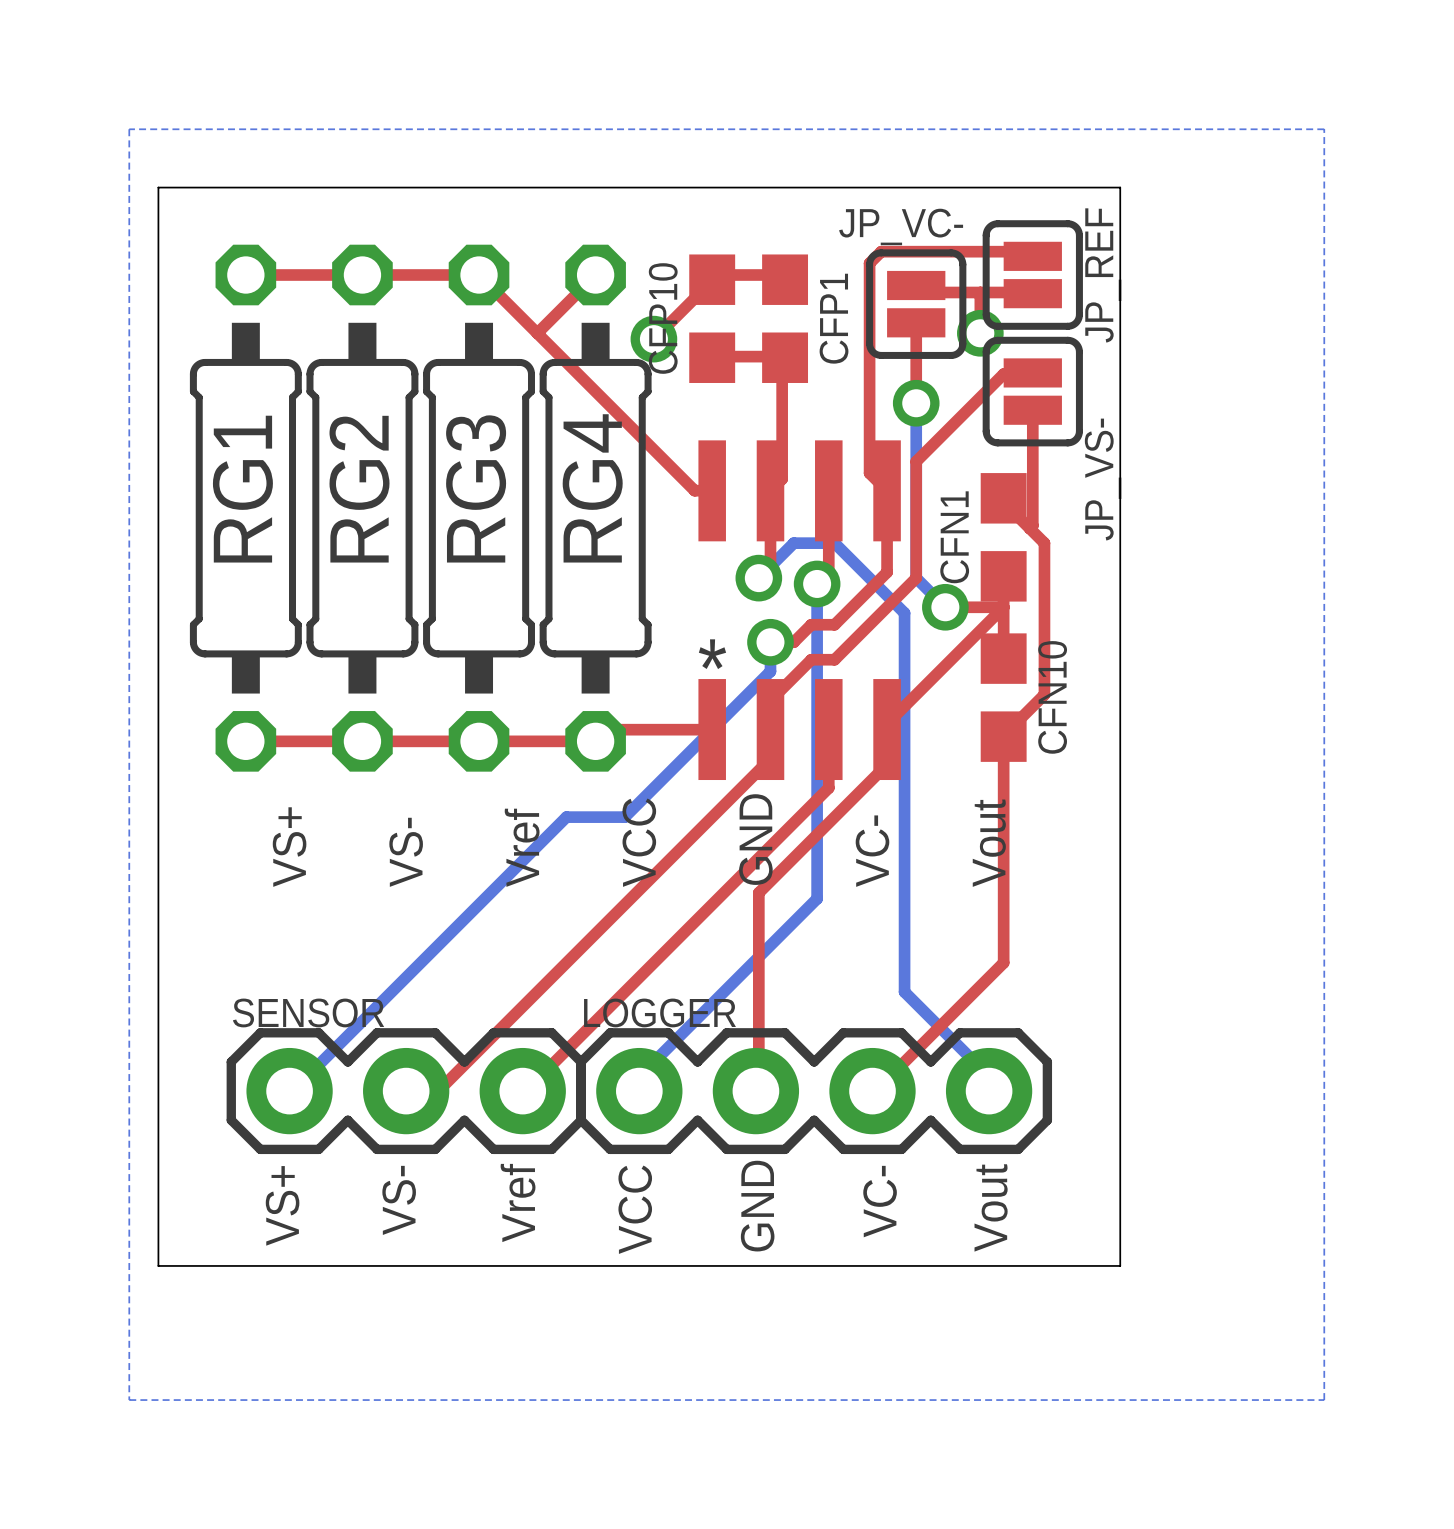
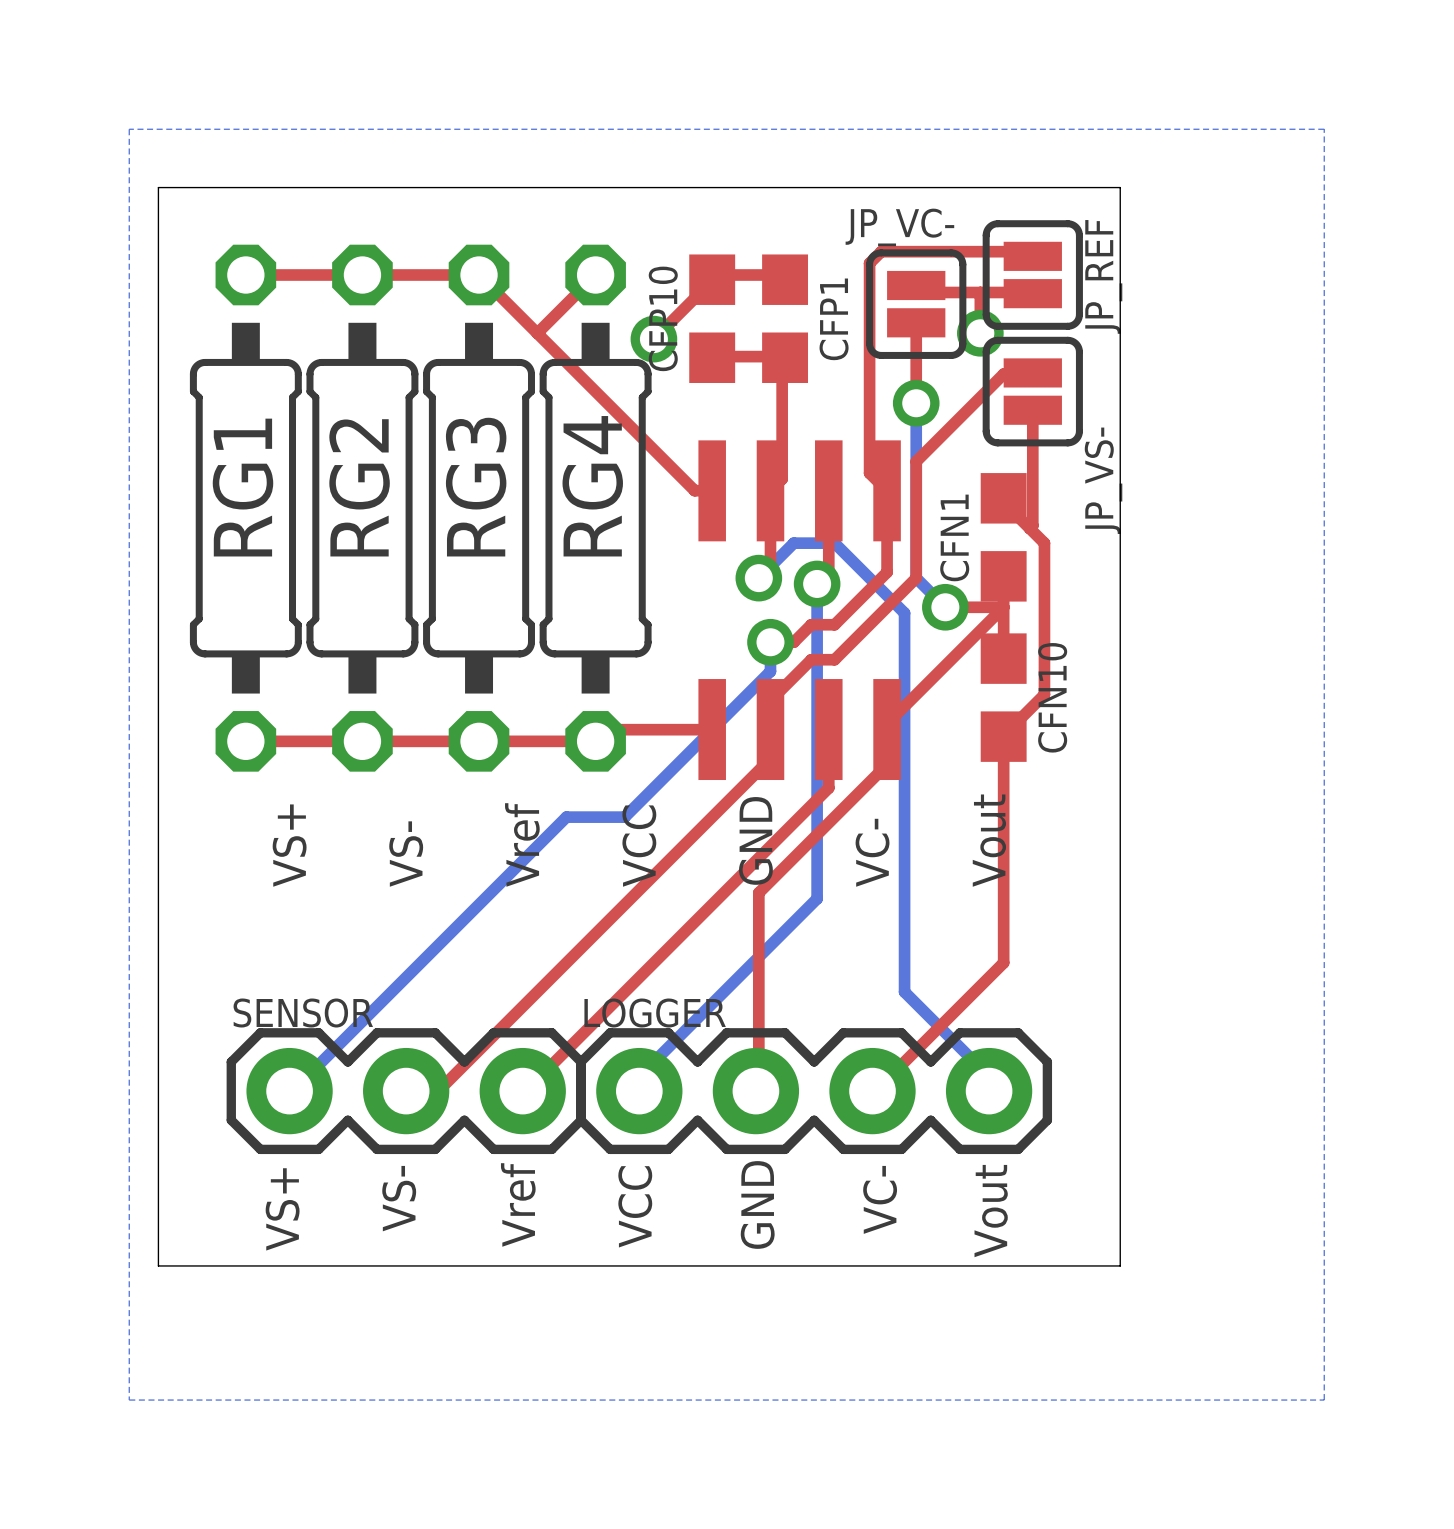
text: * (712, 654) -> none

